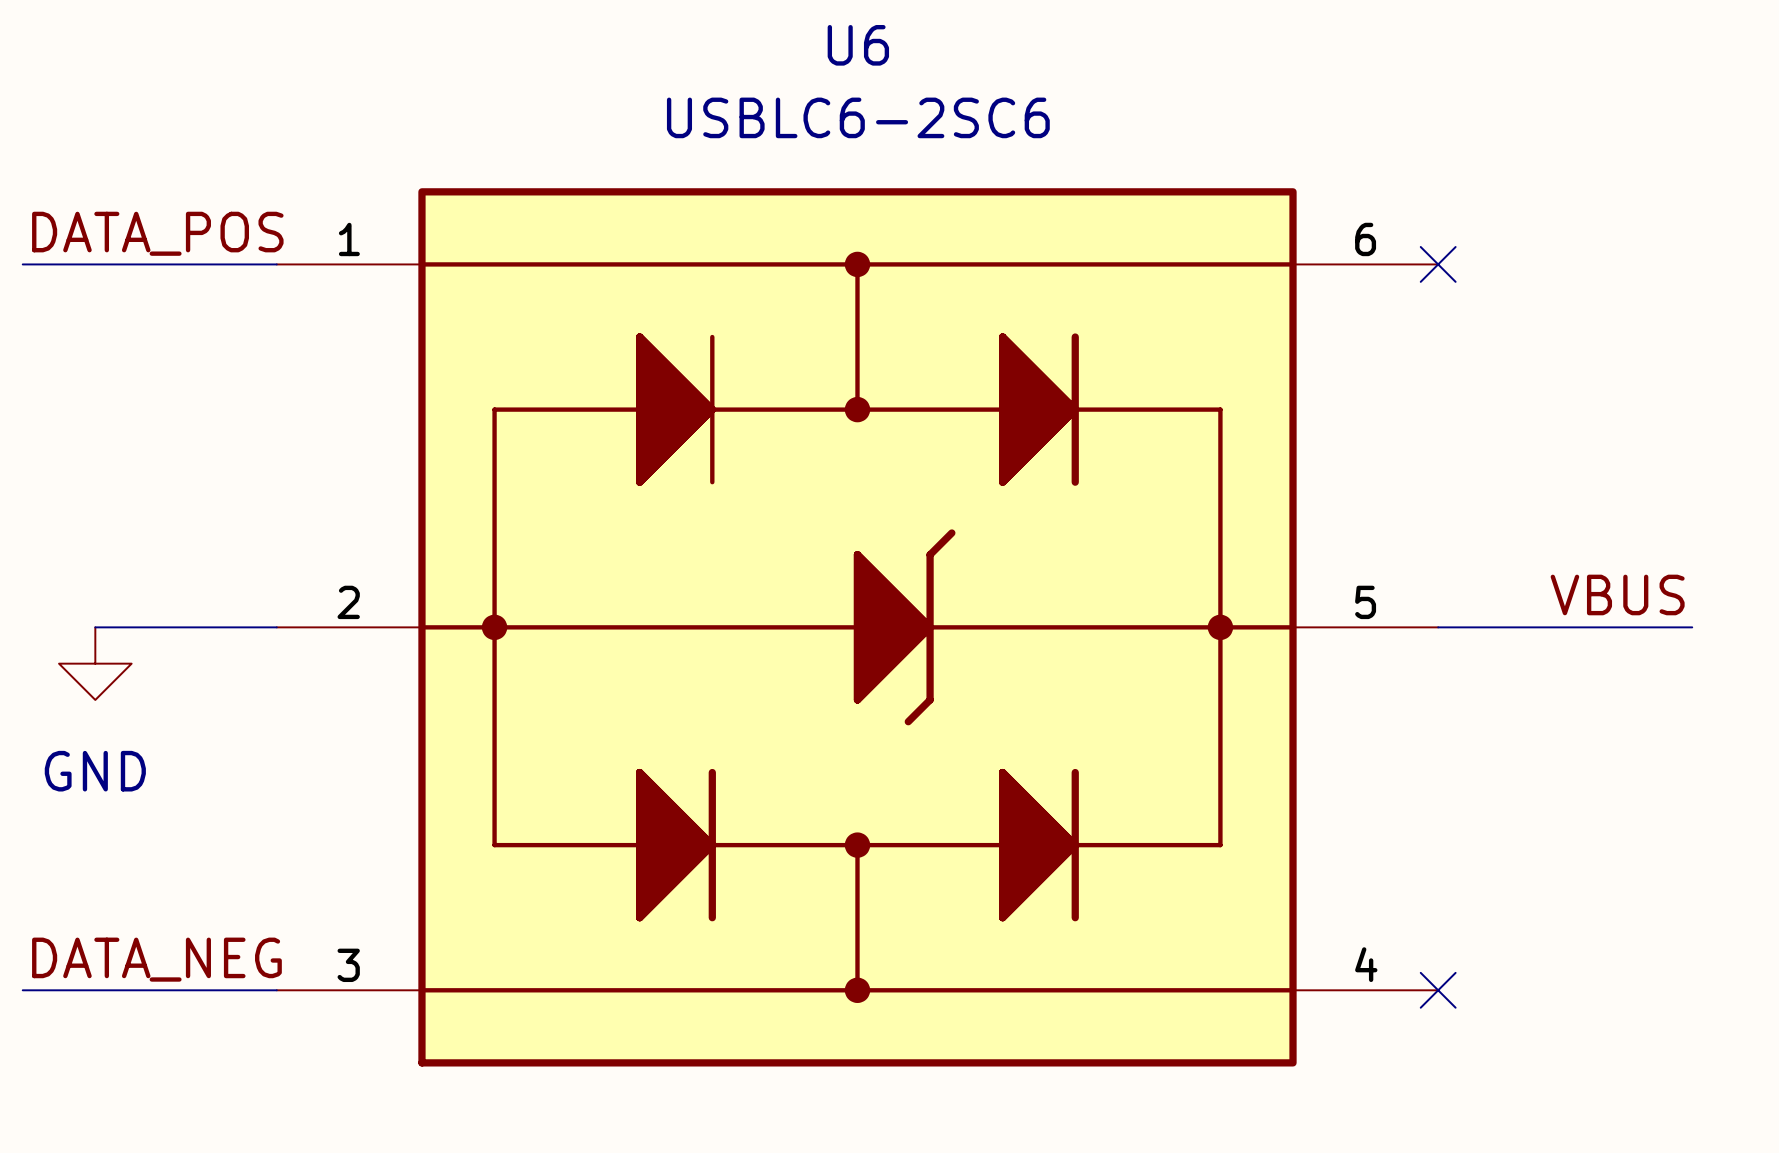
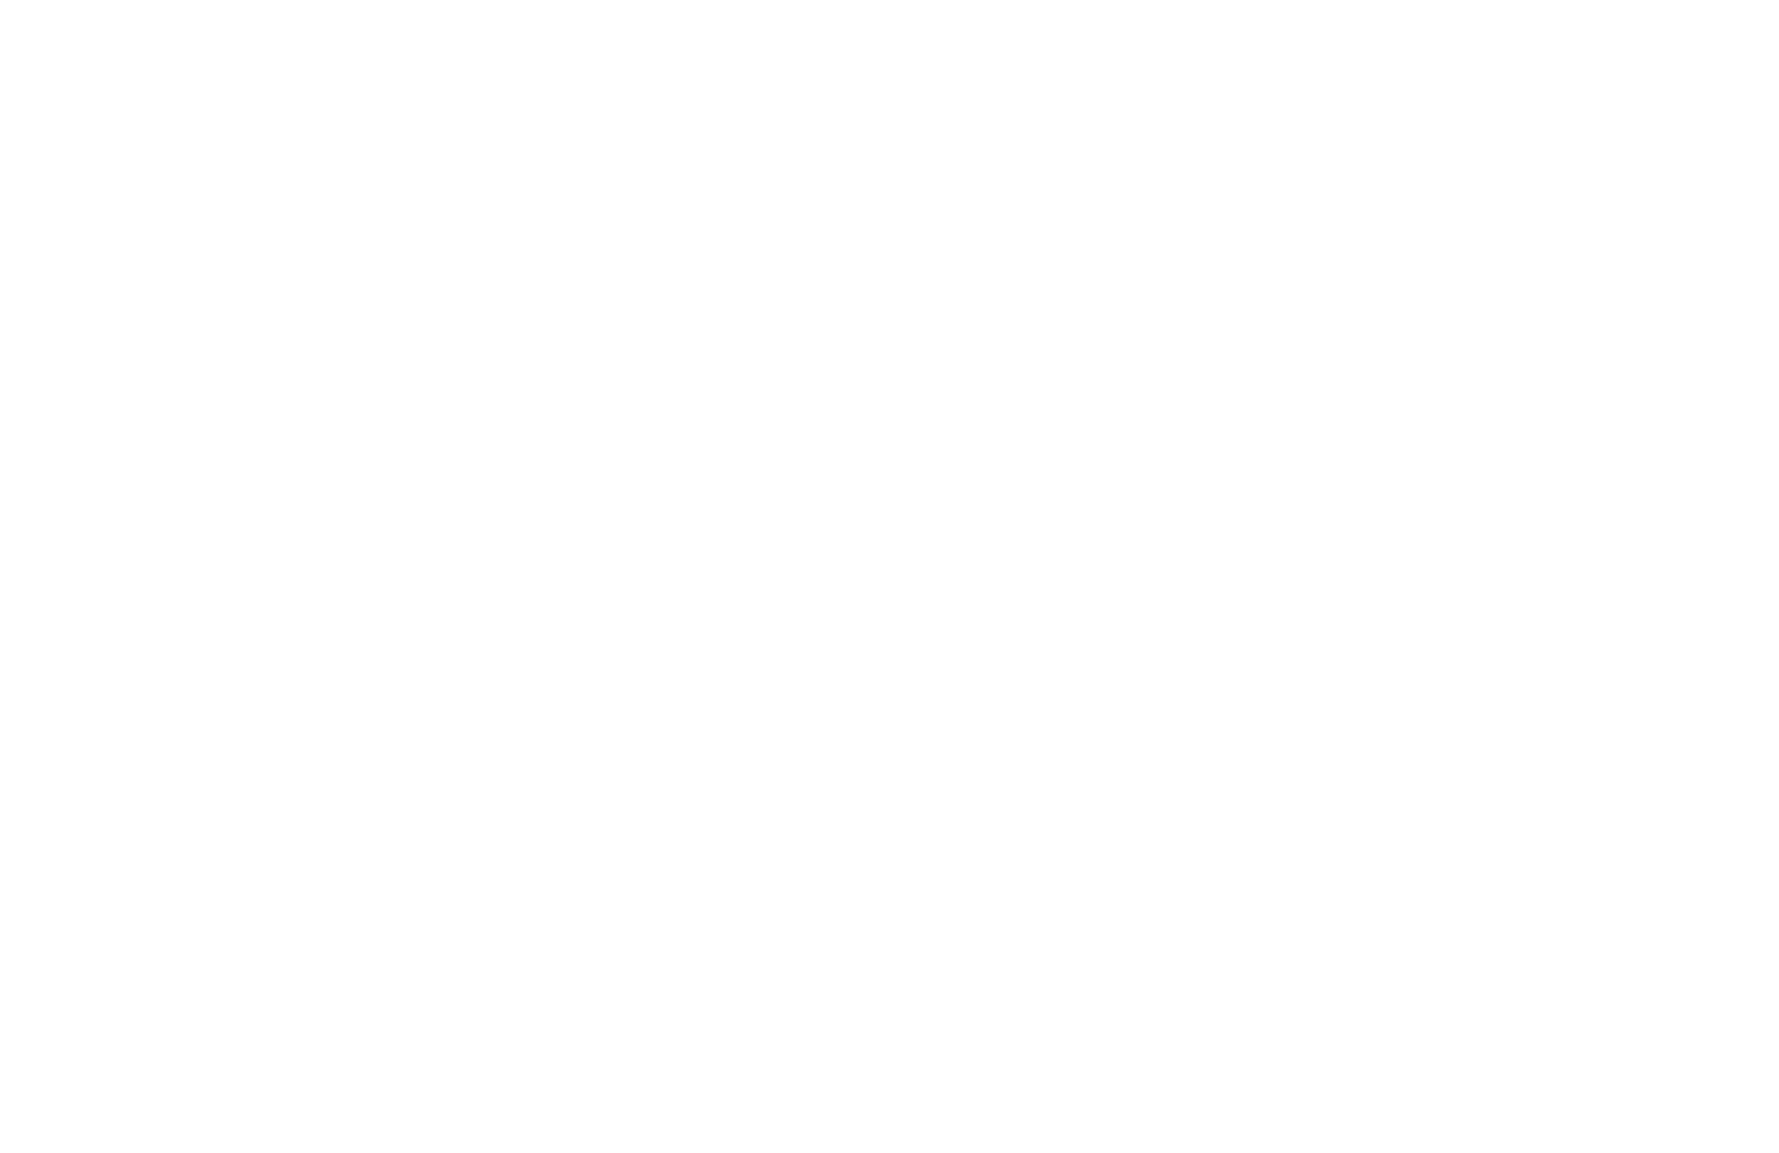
label: DATA_POS (157, 233) -> none
wire: (22, 264) (276, 264) -> none
no-connect mark: (1438, 264) -> none
label: VBUS (1617, 594) -> none
wire: (95, 627) (276, 627) -> none
U6: USBLC6-2SC6 (857, 627) -> none
wire: (1438, 627) (1692, 627) -> none
power symbol: GND (95, 663) -> none
label: DATA_NEG (156, 959) -> none
wire: (22, 990) (276, 990) -> none
no-connect mark: (1438, 990) -> none

